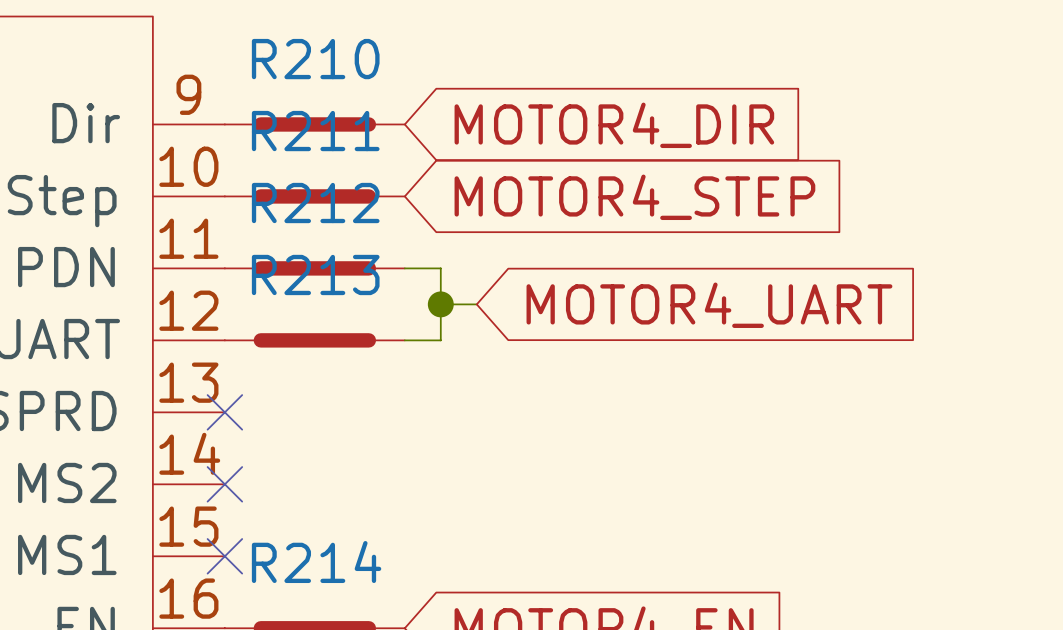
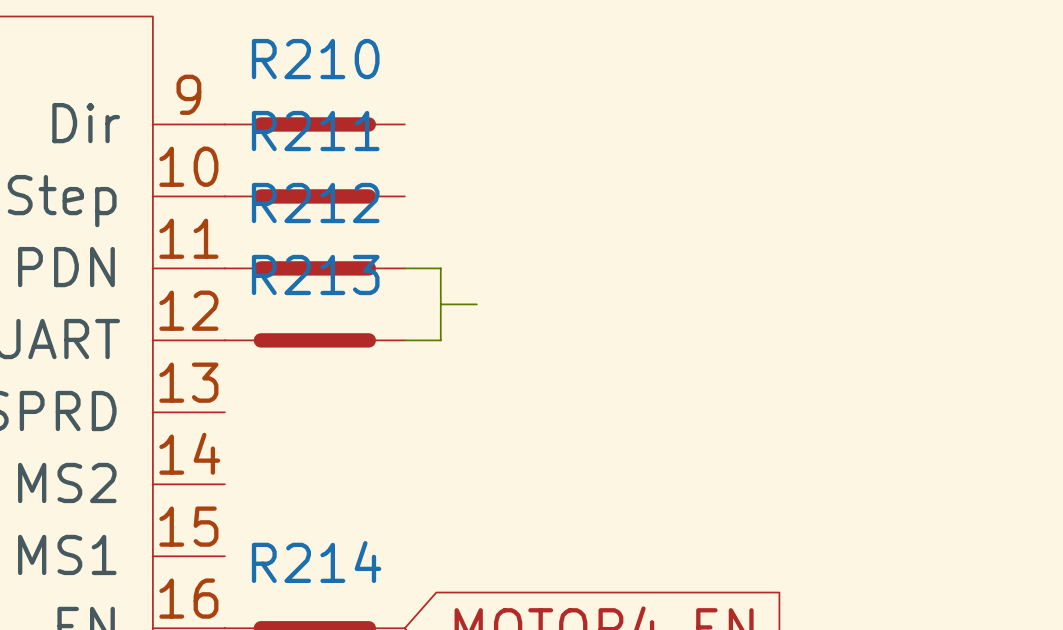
global label: MOTOR4_DIR (614, 125) -> none
global label: MOTOR4_STEP (634, 197) -> none
junction: (440, 304) -> none
global label: MOTOR4_UART (709, 305) -> none
no-connect mark: (224, 412) -> none
no-connect mark: (224, 484) -> none
no-connect mark: (224, 556) -> none

